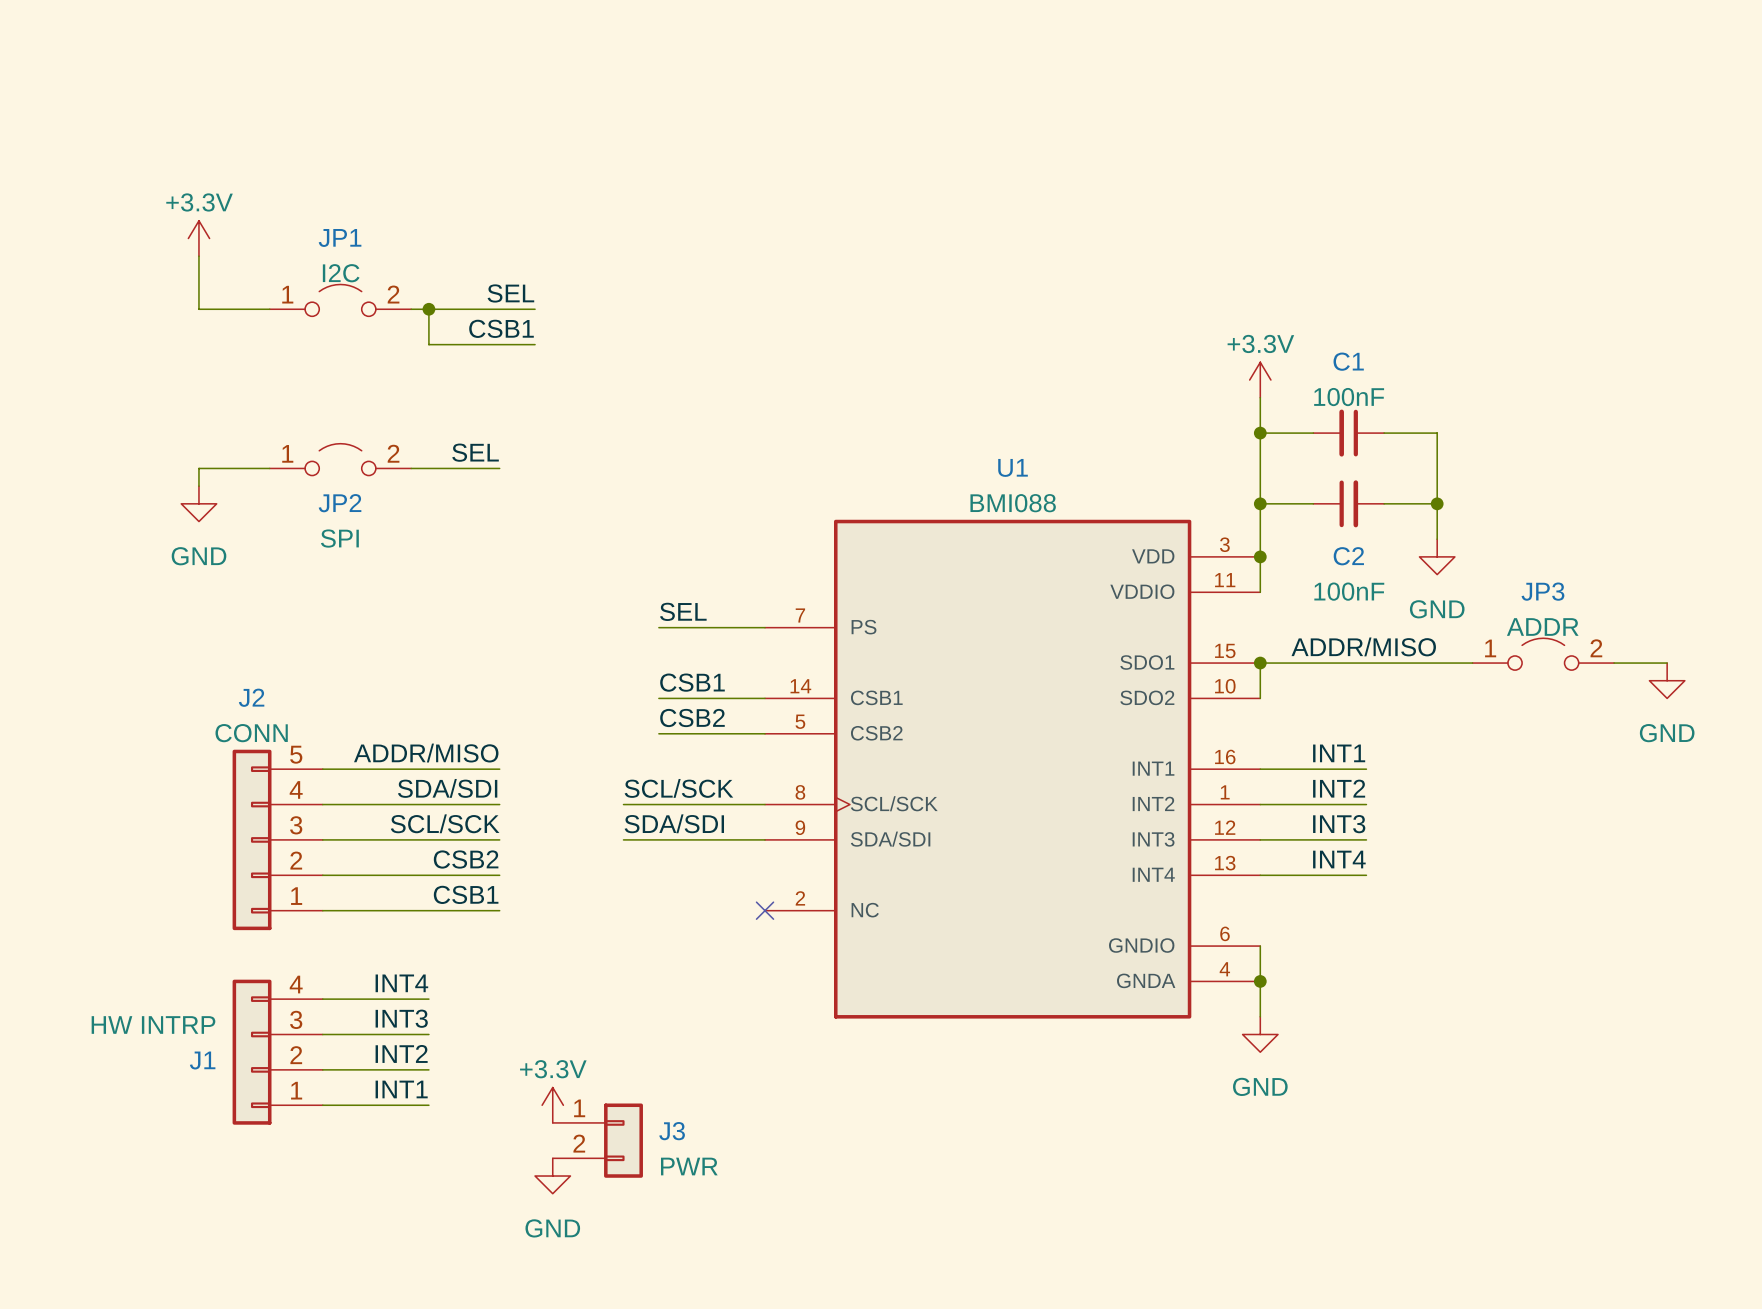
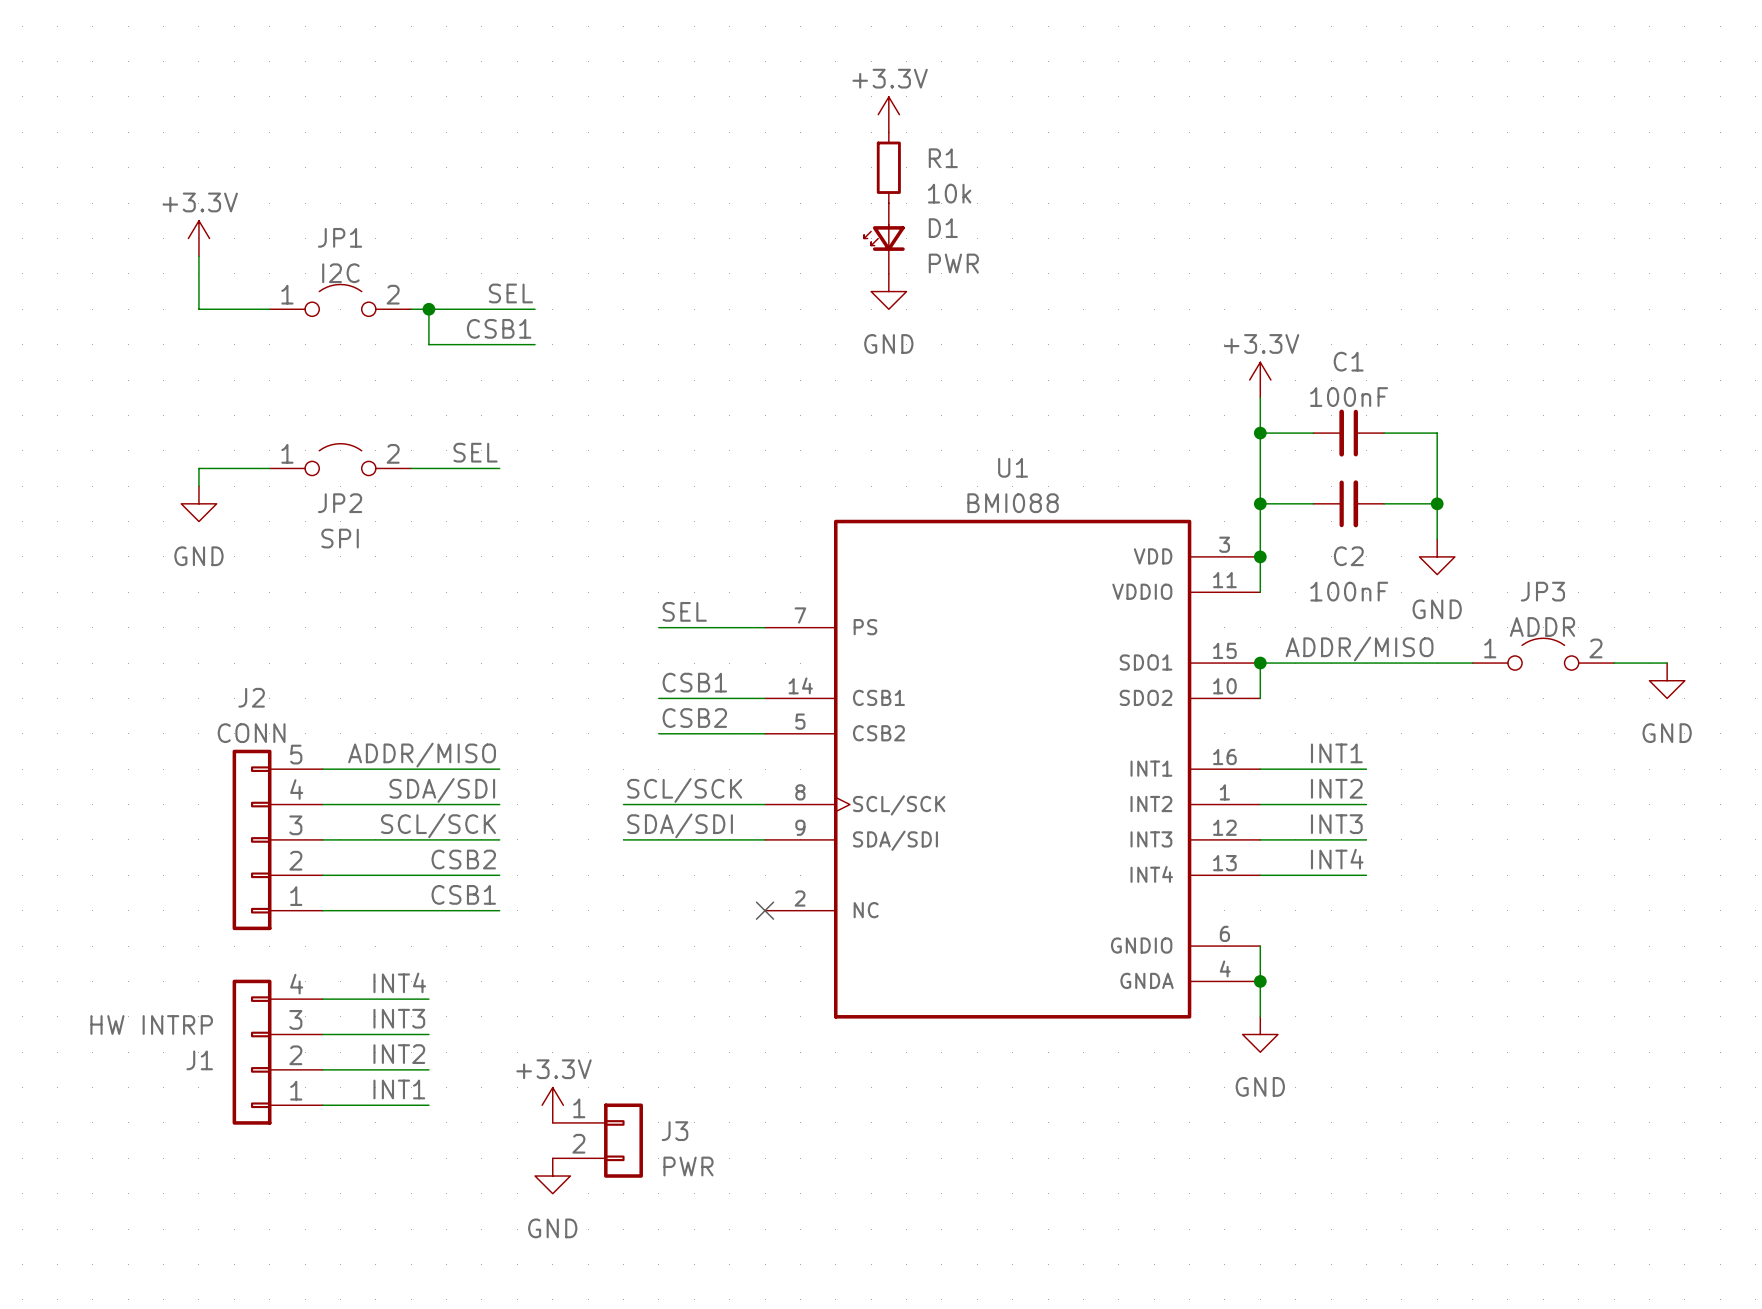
power symbol: none -> +3.3V (888, 114)
R1: none -> 10k (888, 167)
D1: none -> PWR (884, 238)
power symbol: none -> GND (888, 291)

